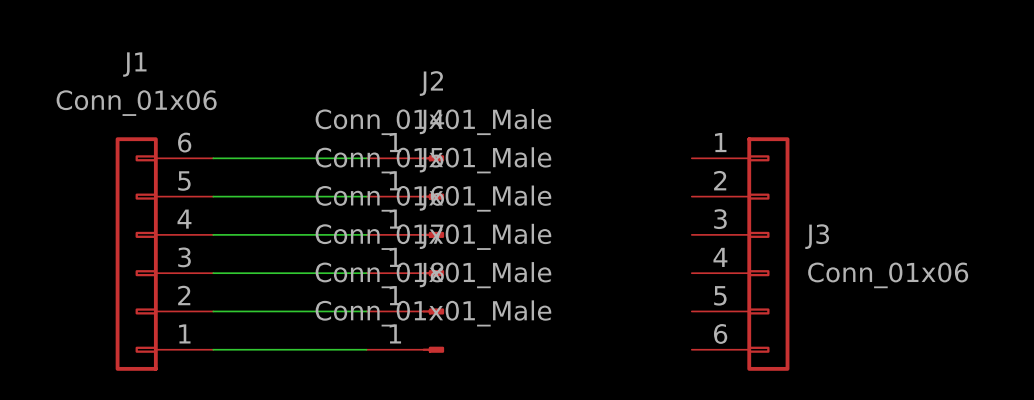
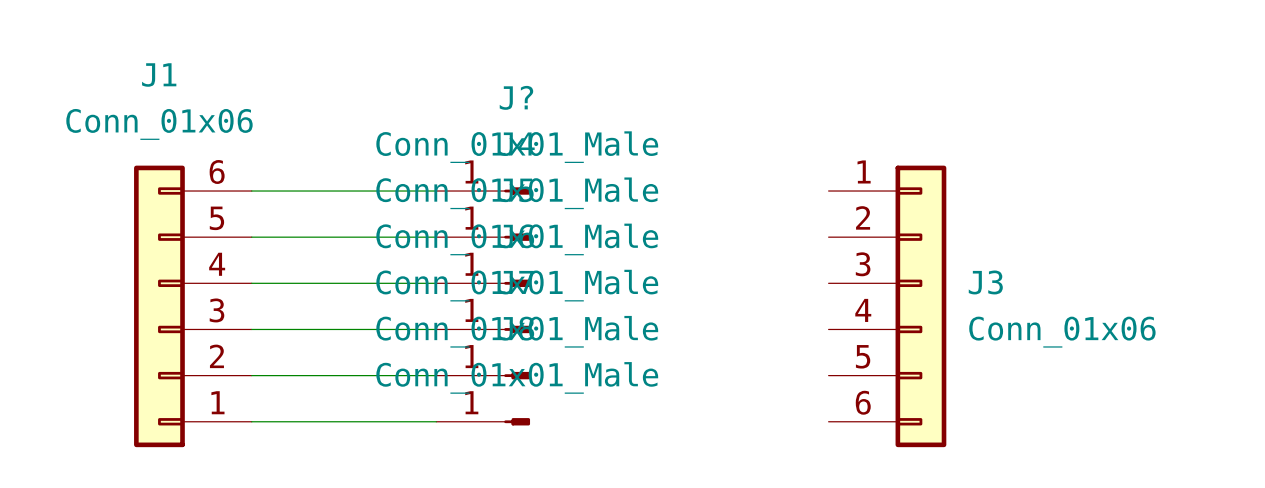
J2 name: J2 (431, 83) -> J? (516, 97)

